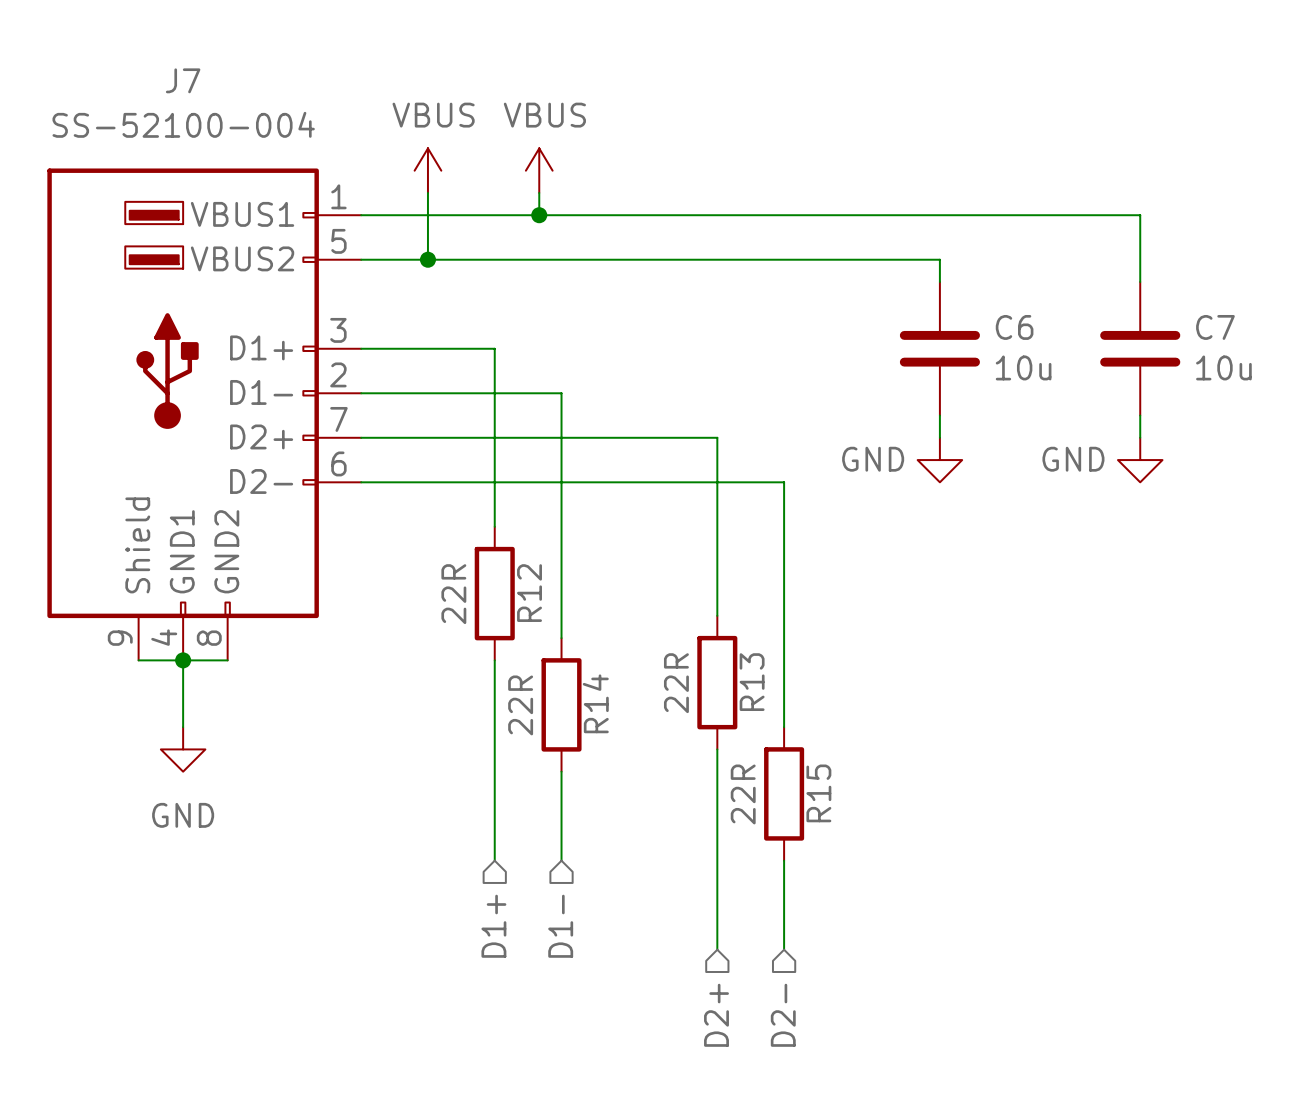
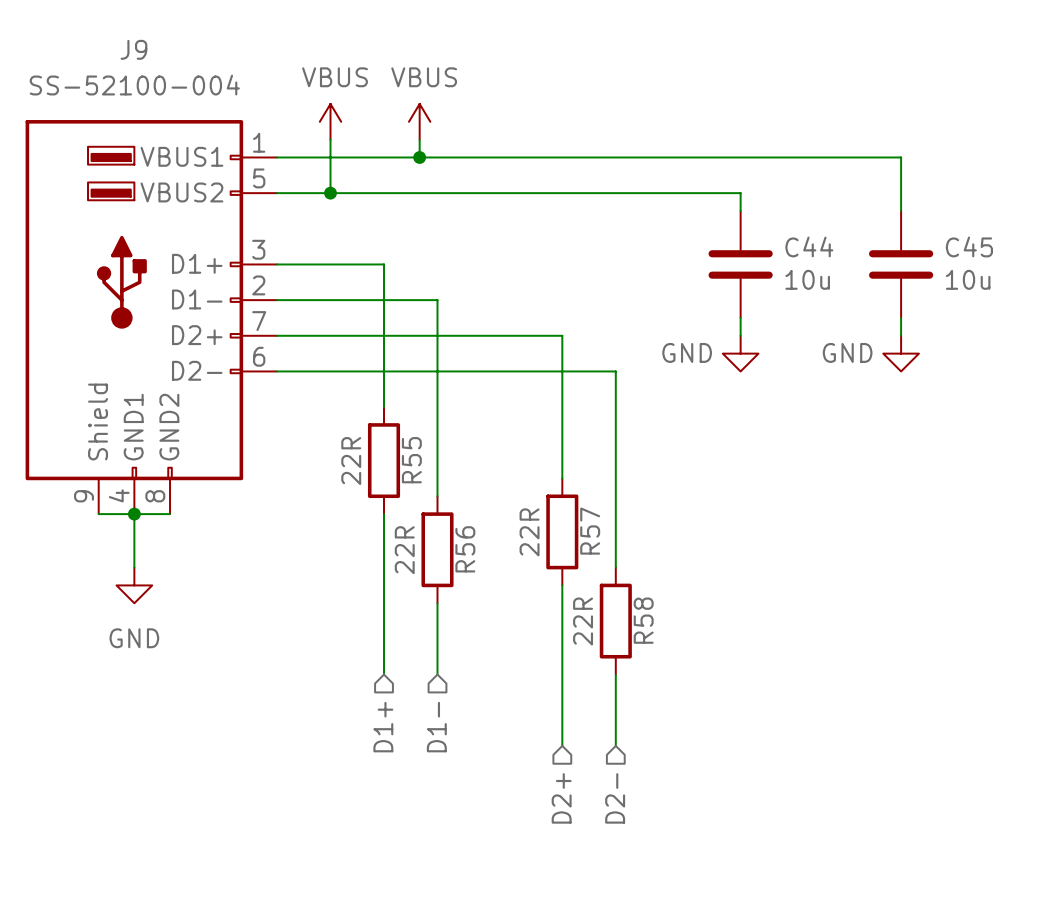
J7 name: J7 (183, 80) -> J9 (133, 49)
C6 name: C6 (1014, 327) -> C44 (809, 246)
C7 name: C7 (1215, 327) -> C45 (969, 246)
R12 name: R12 (529, 593) -> R55 (411, 460)
R13 name: R13 (752, 682) -> R57 (590, 531)
R14 name: R14 (595, 703) -> R56 (465, 549)
R15 name: R15 (818, 793) -> R58 (643, 620)

